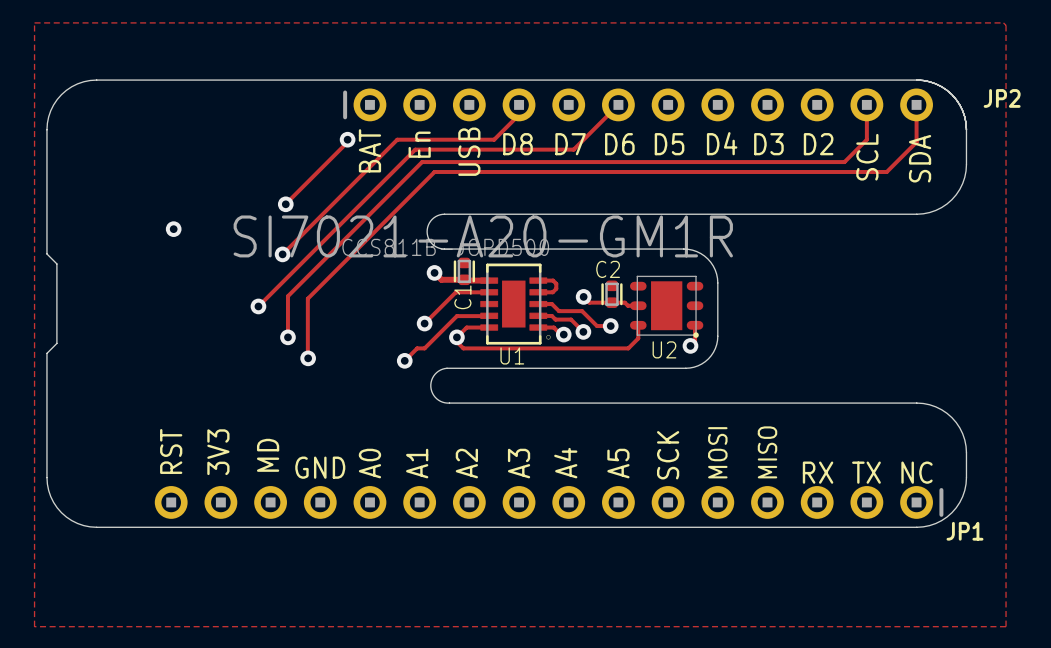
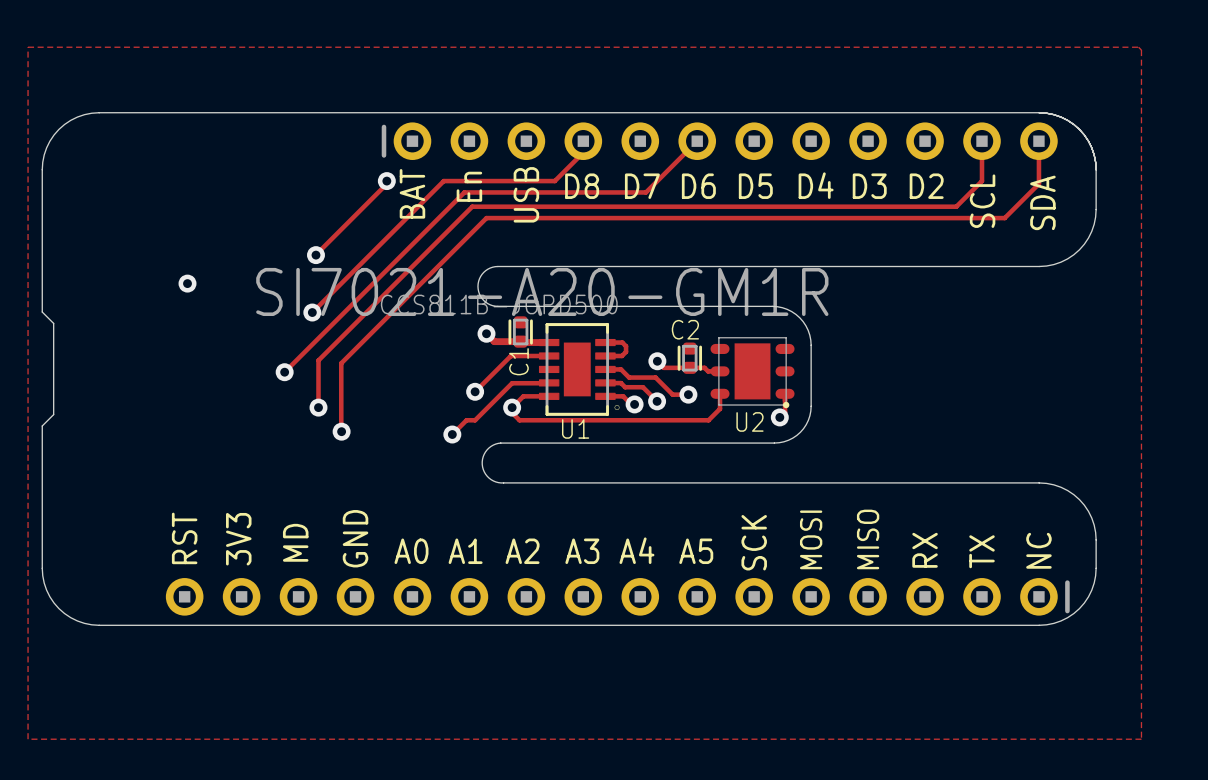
JP2 name: JP2 (1002, 98) -> none
text rotation: 0° (369, 463) -> 90° clockwise (411, 551)
text rotation: 0° (417, 463) -> 90° clockwise (465, 551)
text rotation: 0° (466, 463) -> 90° clockwise (522, 551)
text rotation: 0° (519, 463) -> 90° clockwise (582, 551)
text rotation: 0° (565, 463) -> 90° clockwise (636, 550)
text rotation: 0° (618, 463) -> 90° clockwise (696, 551)
text rotation: 0° (320, 467) -> 90° counterclockwise (355, 538)
text rotation: 0° (818, 472) -> 90° counterclockwise (925, 550)
text rotation: 0° (866, 472) -> 90° counterclockwise (982, 551)
text rotation: 0° (917, 472) -> 90° counterclockwise (1038, 550)
JP1 name: JP1 (964, 531) -> none

